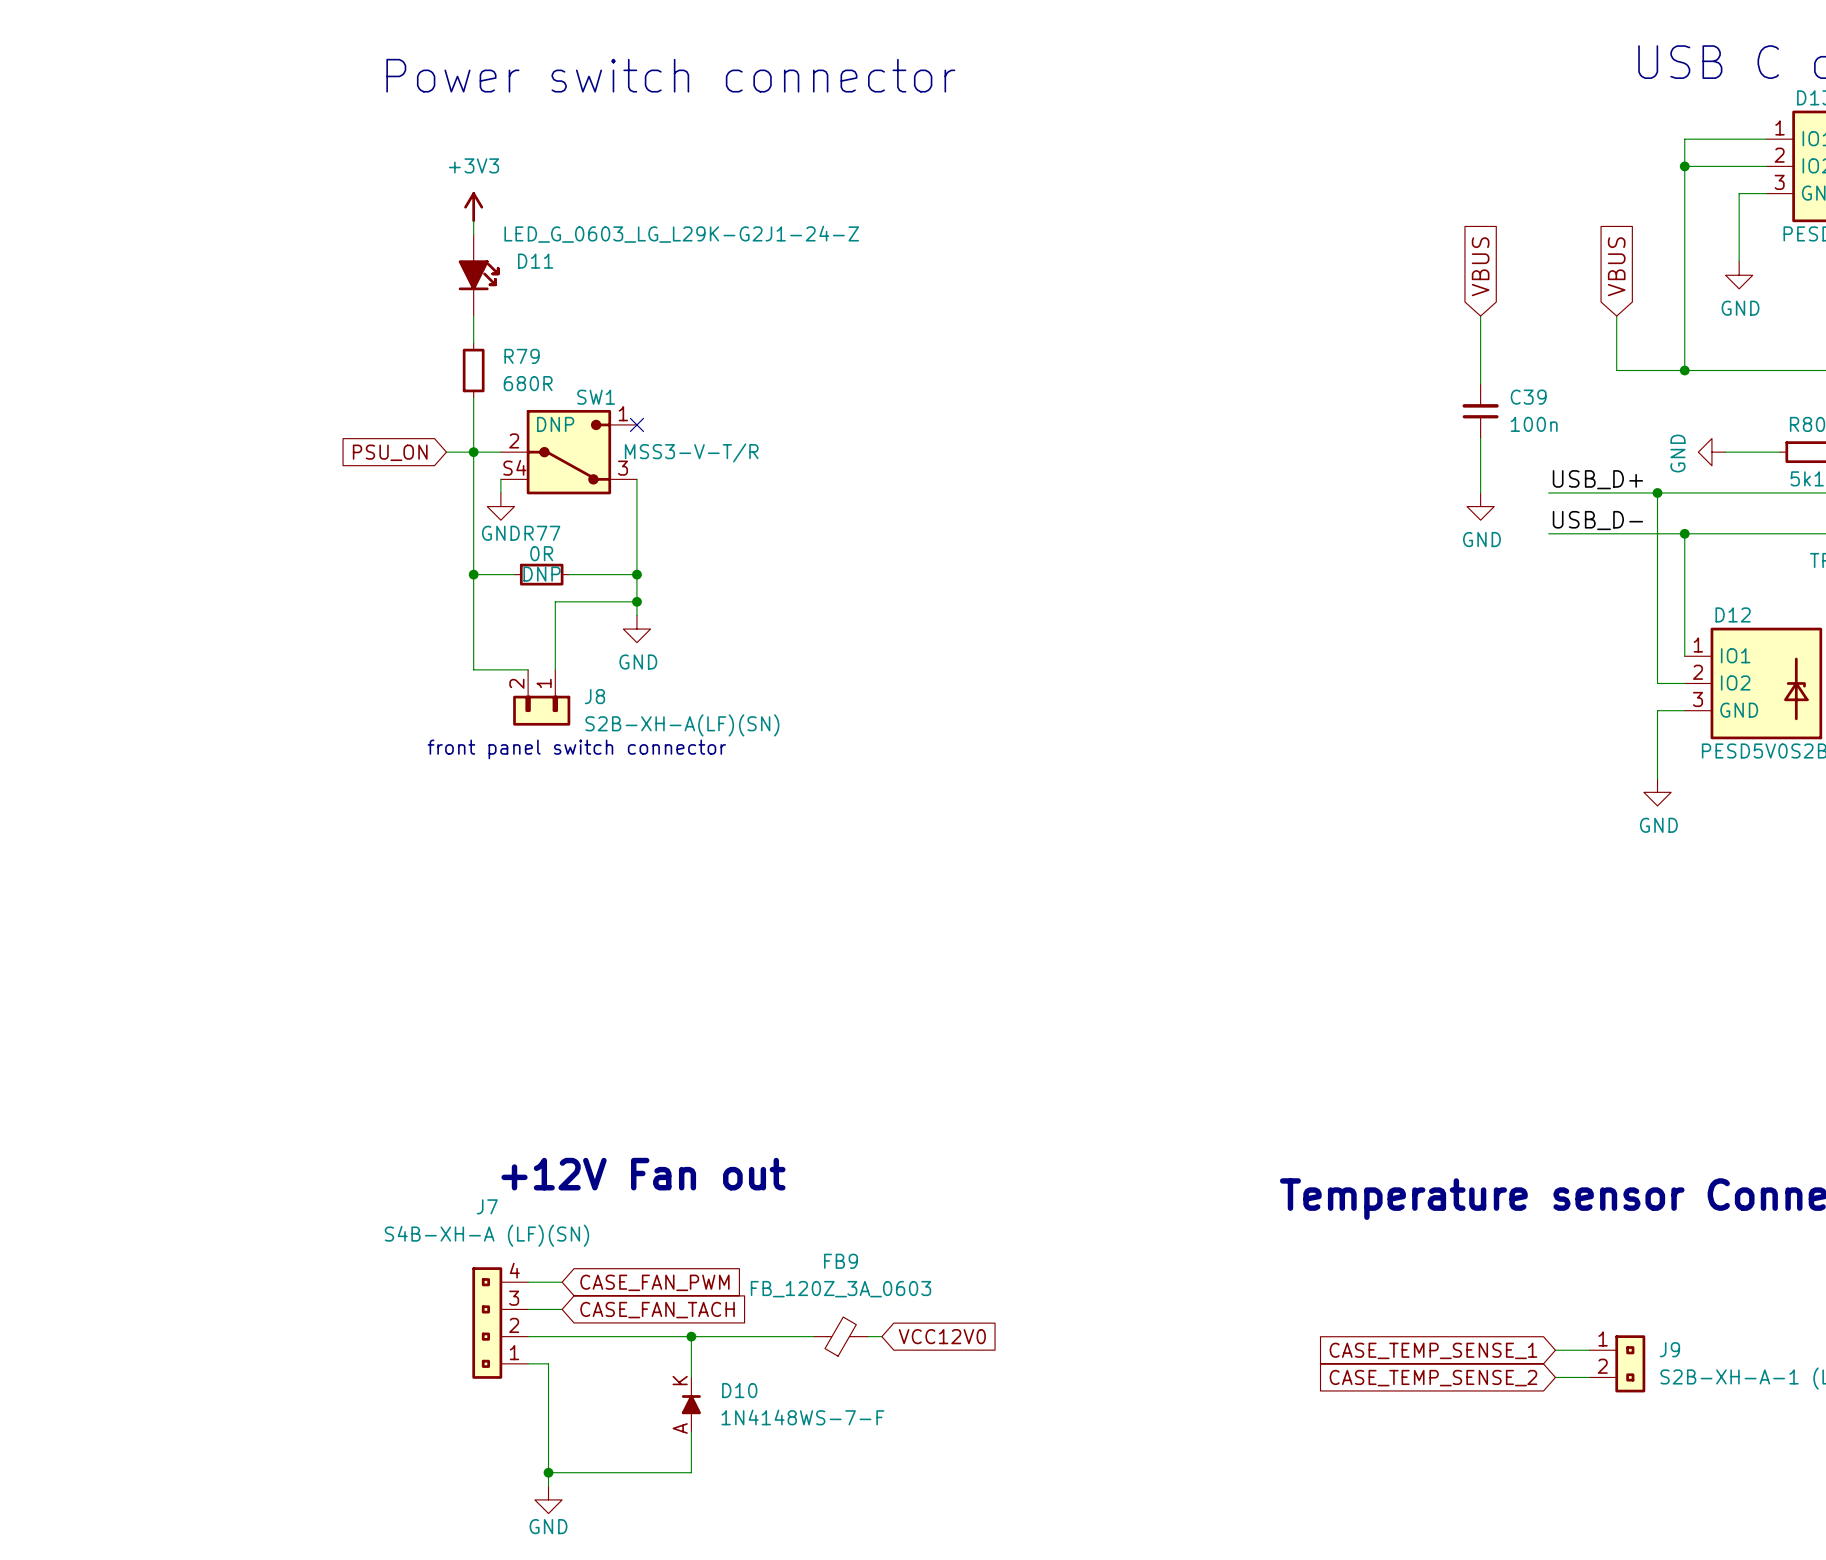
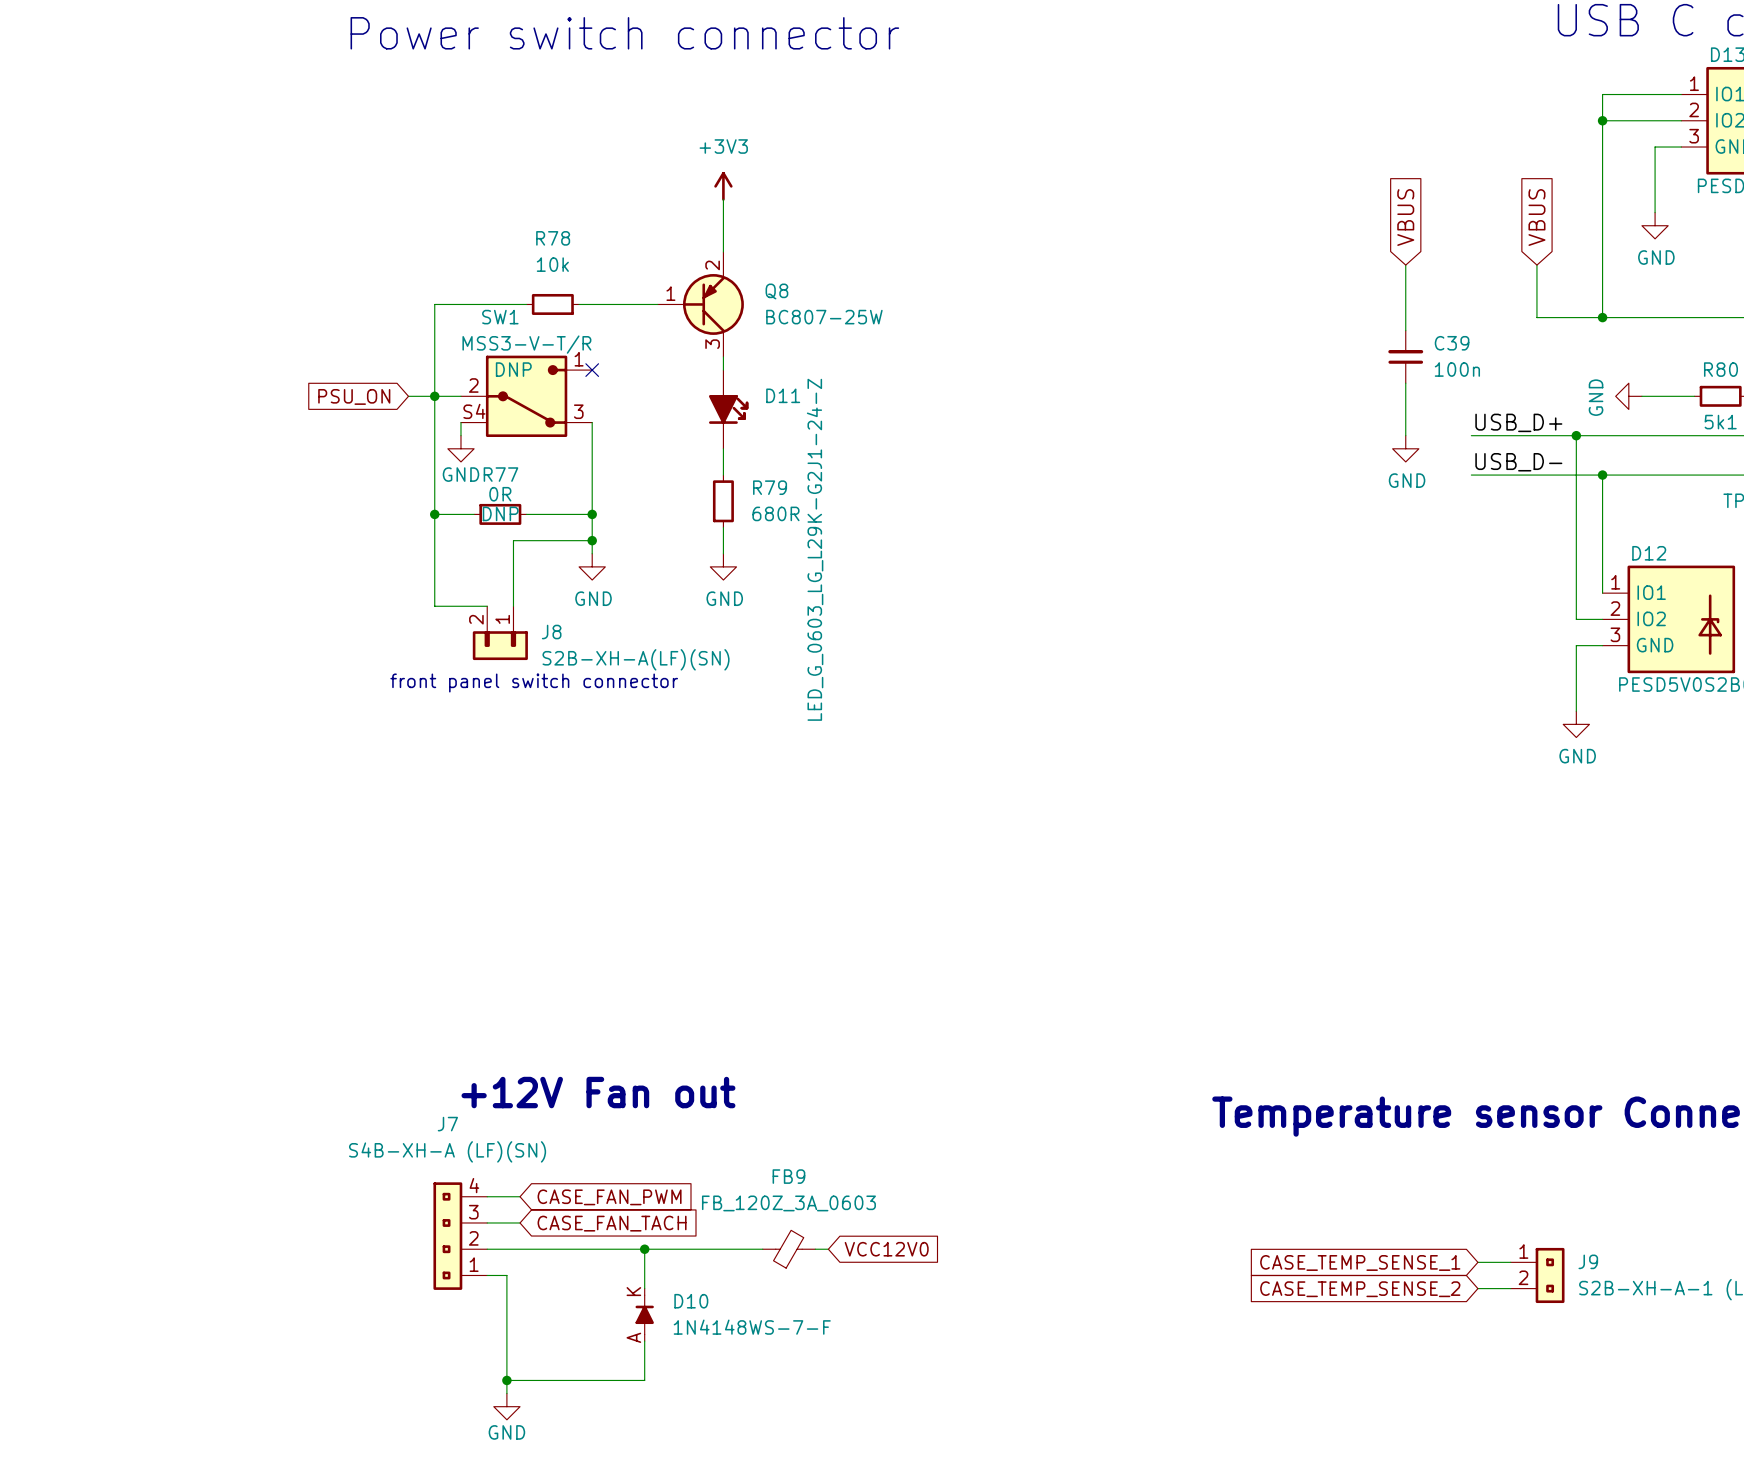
power symbol: +3V3 (473, 207) -> none
wire: (473, 220) (473, 234) -> none
D11 value rotation: 0° (681, 234) -> 90° counterclockwise (815, 549)
power symbol: none -> +3V3 (723, 186)
wire: none -> (723, 199) (723, 251)
D11 position: (479, 275) -> (728, 409)
wire: (473, 316) (473, 343) -> none
wire: none -> (526, 304) (434, 304) (434, 343)
R78: none -> (552, 304)
wire: none -> (579, 304) (657, 304)
Q8: none -> BC807-25W (700, 304)
R79 position: (473, 370) -> (723, 501)
SW1 name position: SW1 (596, 397) -> SW1 (500, 317)
wire: none -> (723, 356) (723, 370)
SW1 text position: MSS3-V-T/R (691, 452) -> MSS3-V-T/R (526, 344)
wire: none -> (723, 448) (723, 475)
wire: none -> (723, 527) (723, 553)
power symbol: none -> GND (723, 566)

